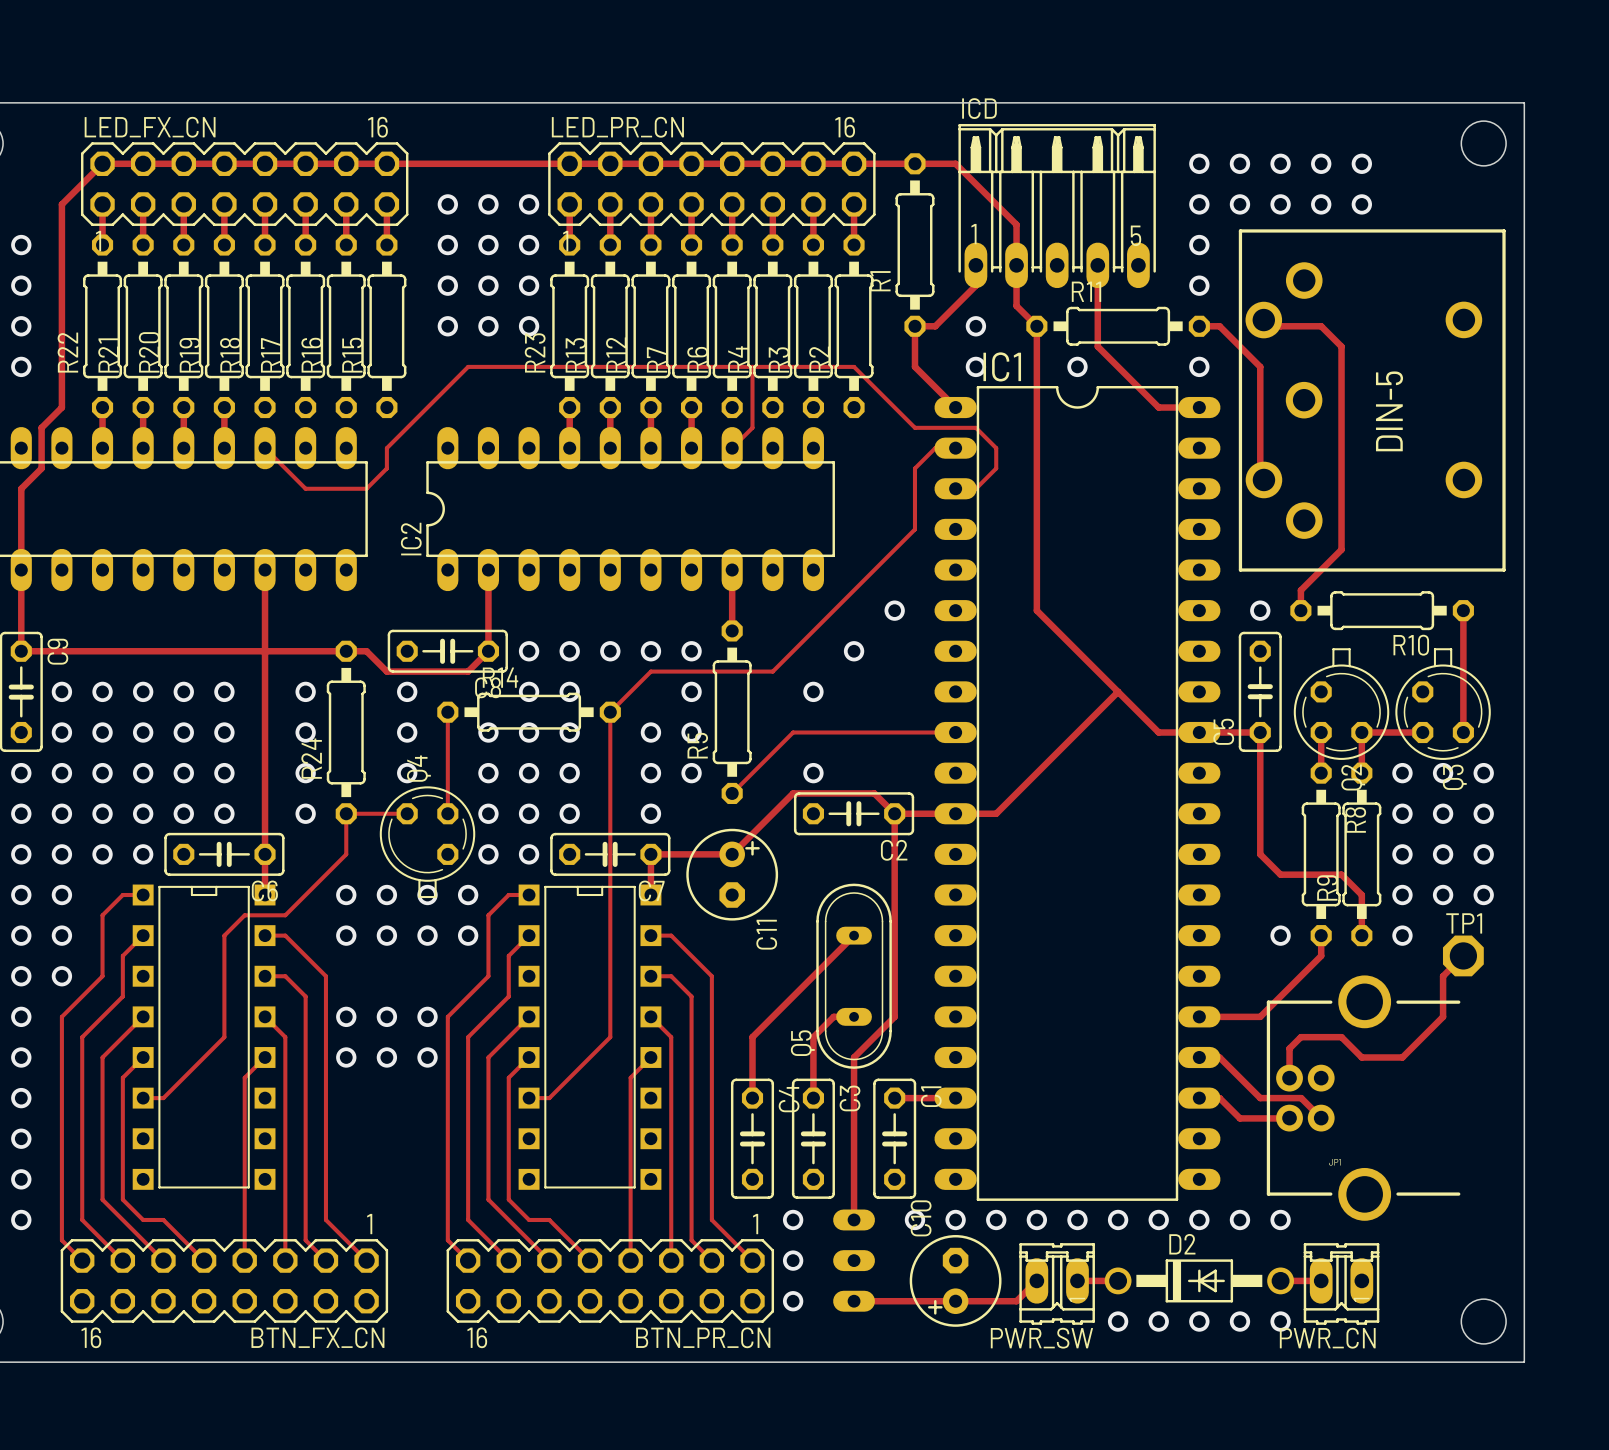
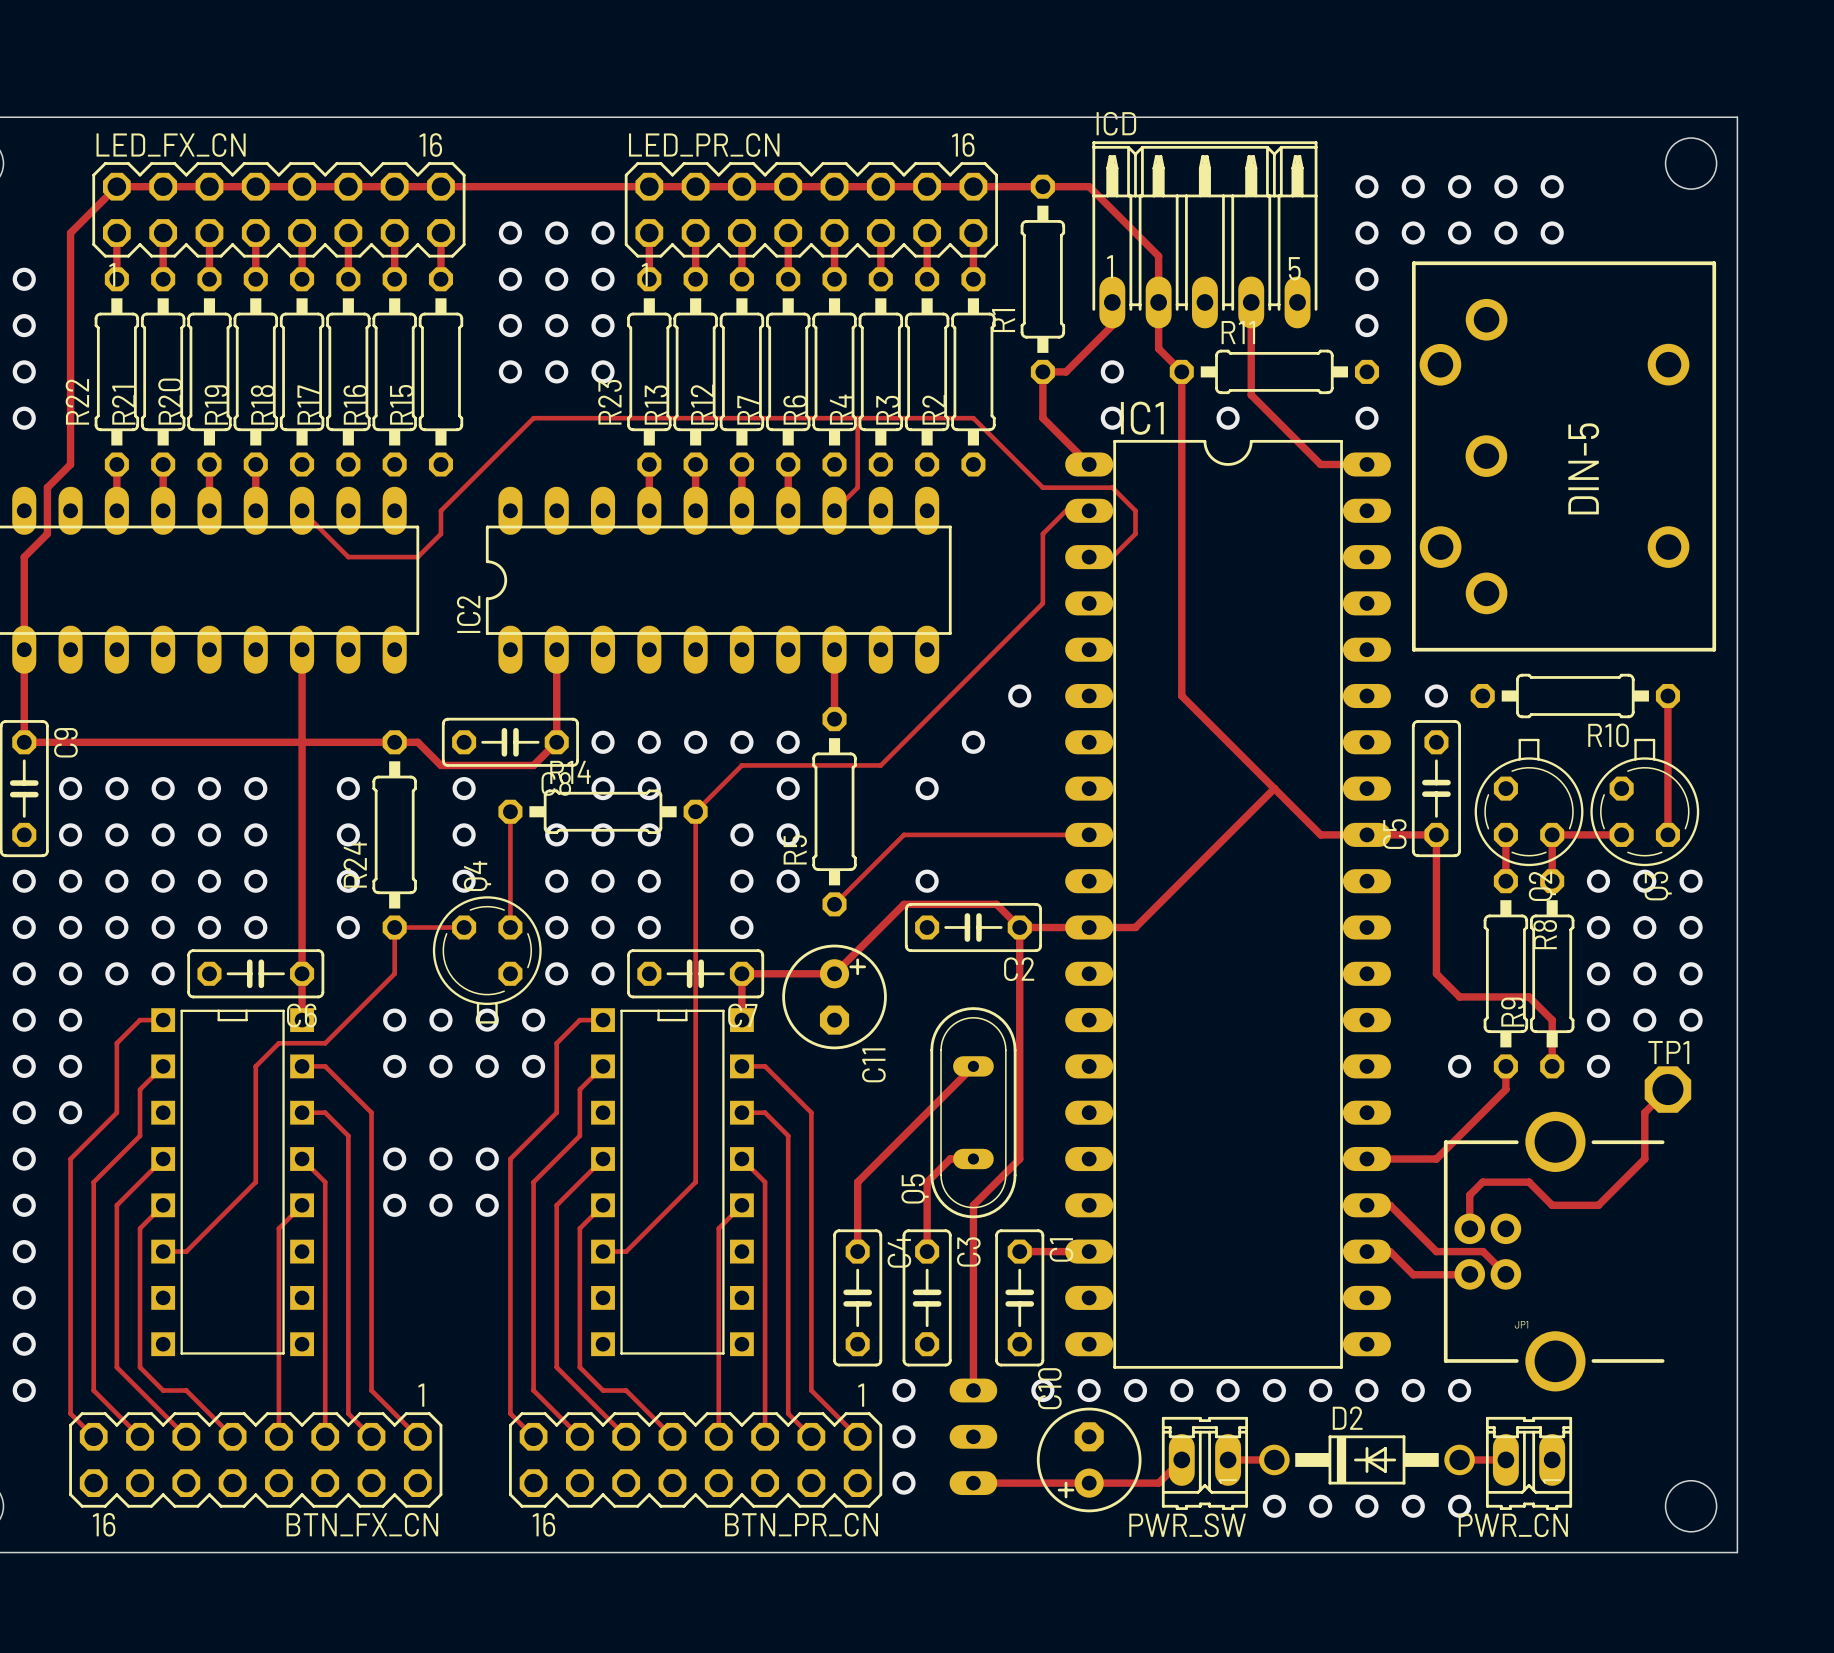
track: (1263, 320) (1274, 320) (1280, 326) (1321, 326) (1341, 346) (1341, 549) (1300, 590) (1300, 610) -> none
track: (1199, 326) (1219, 326) (1260, 366) (1260, 476) (1263, 479) -> none

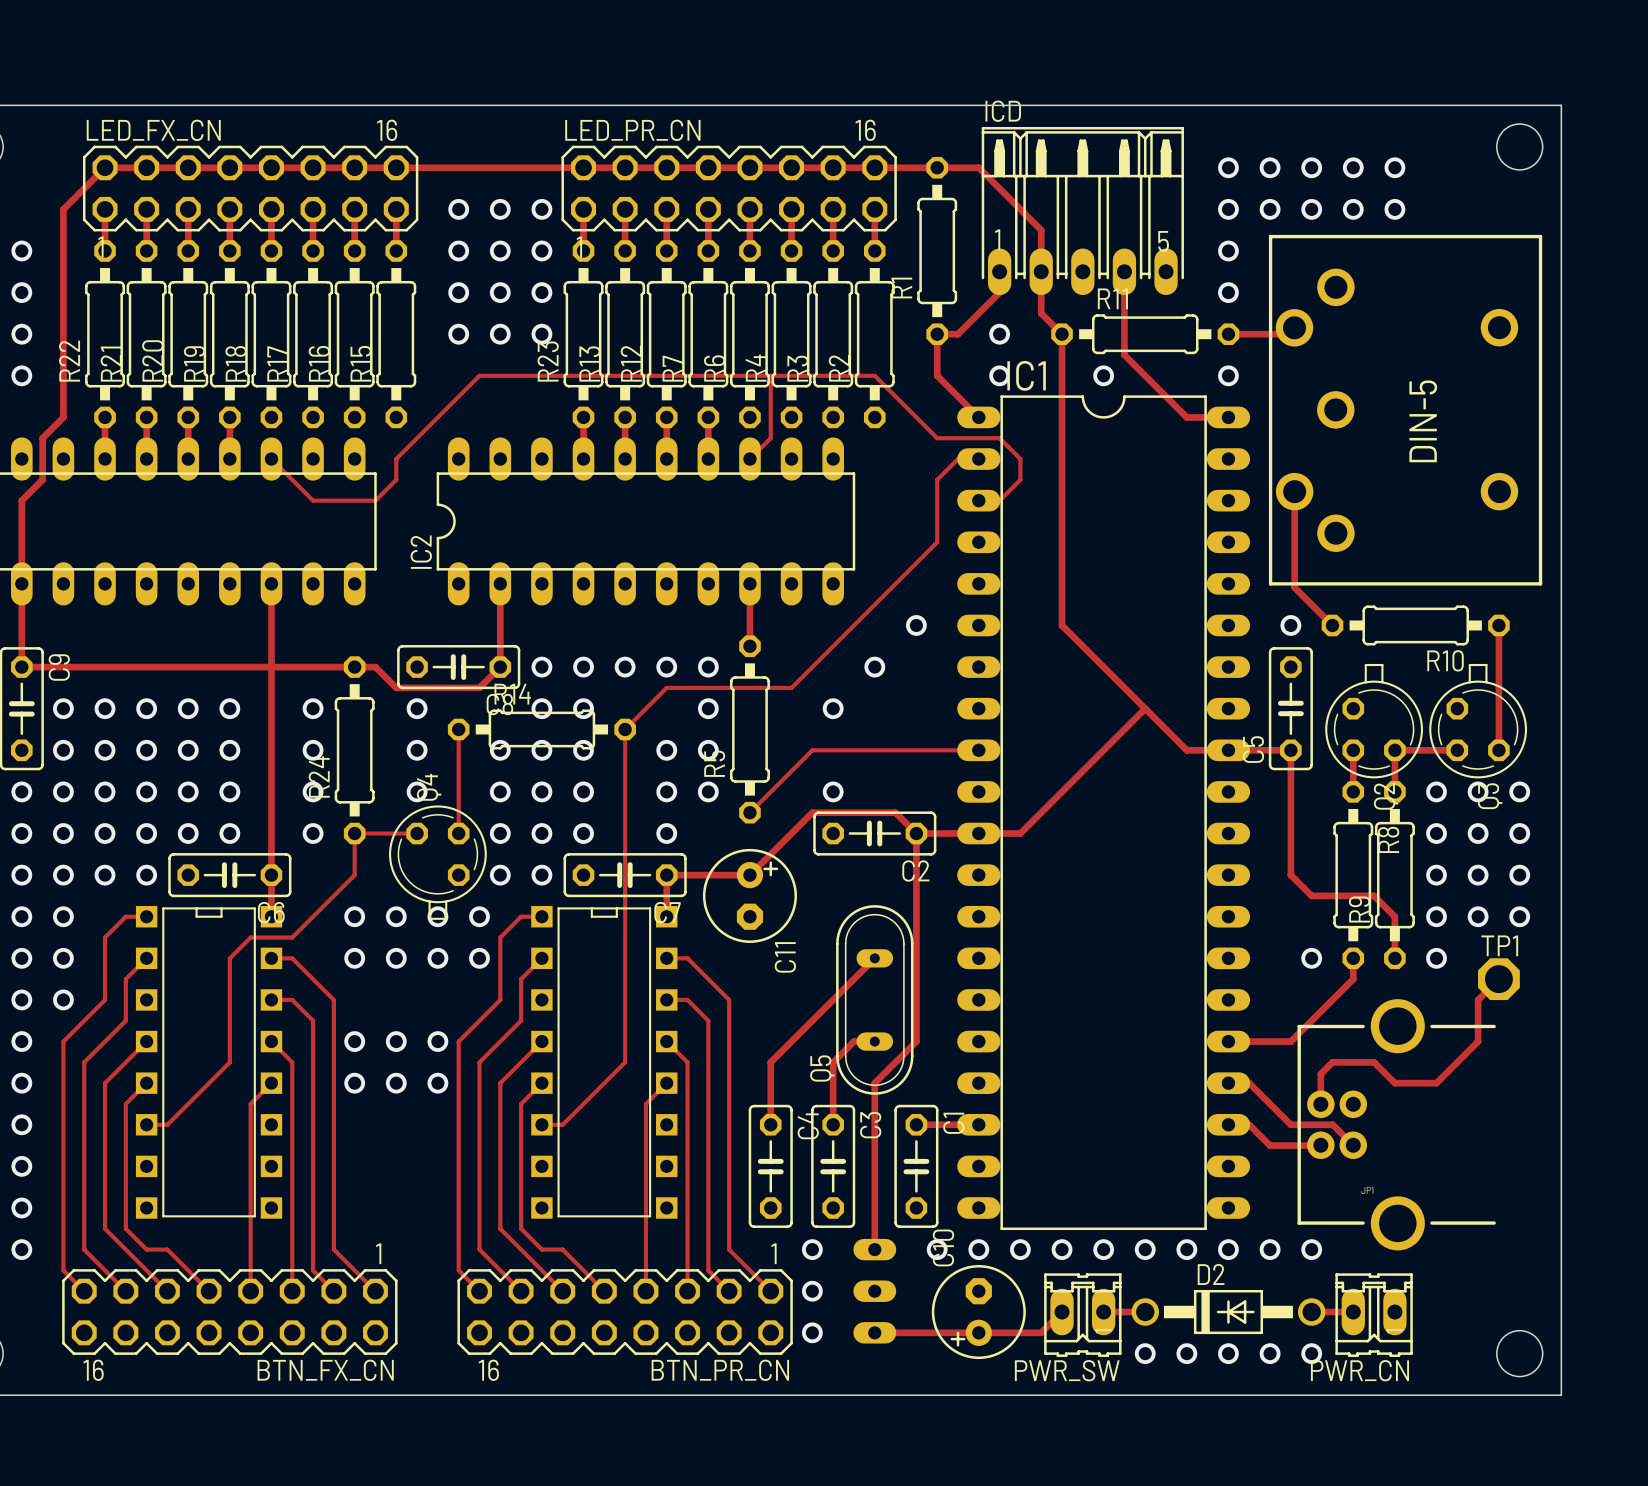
track: none -> (1294, 327) (1288, 334) (1228, 334)
track: none -> (1294, 491) (1294, 587) (1332, 625)

